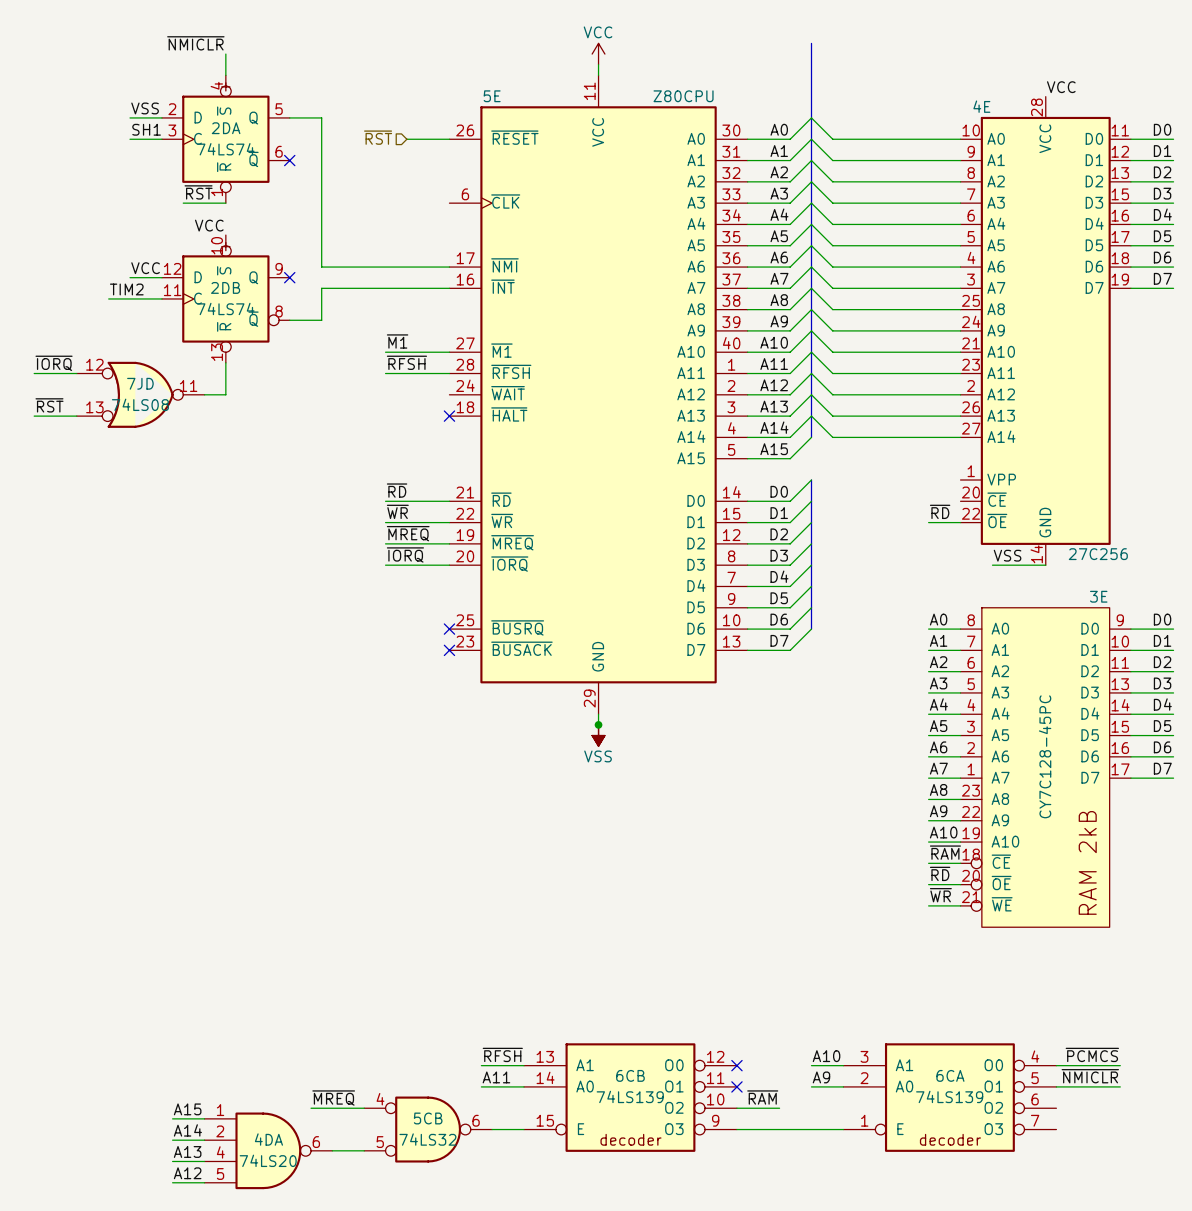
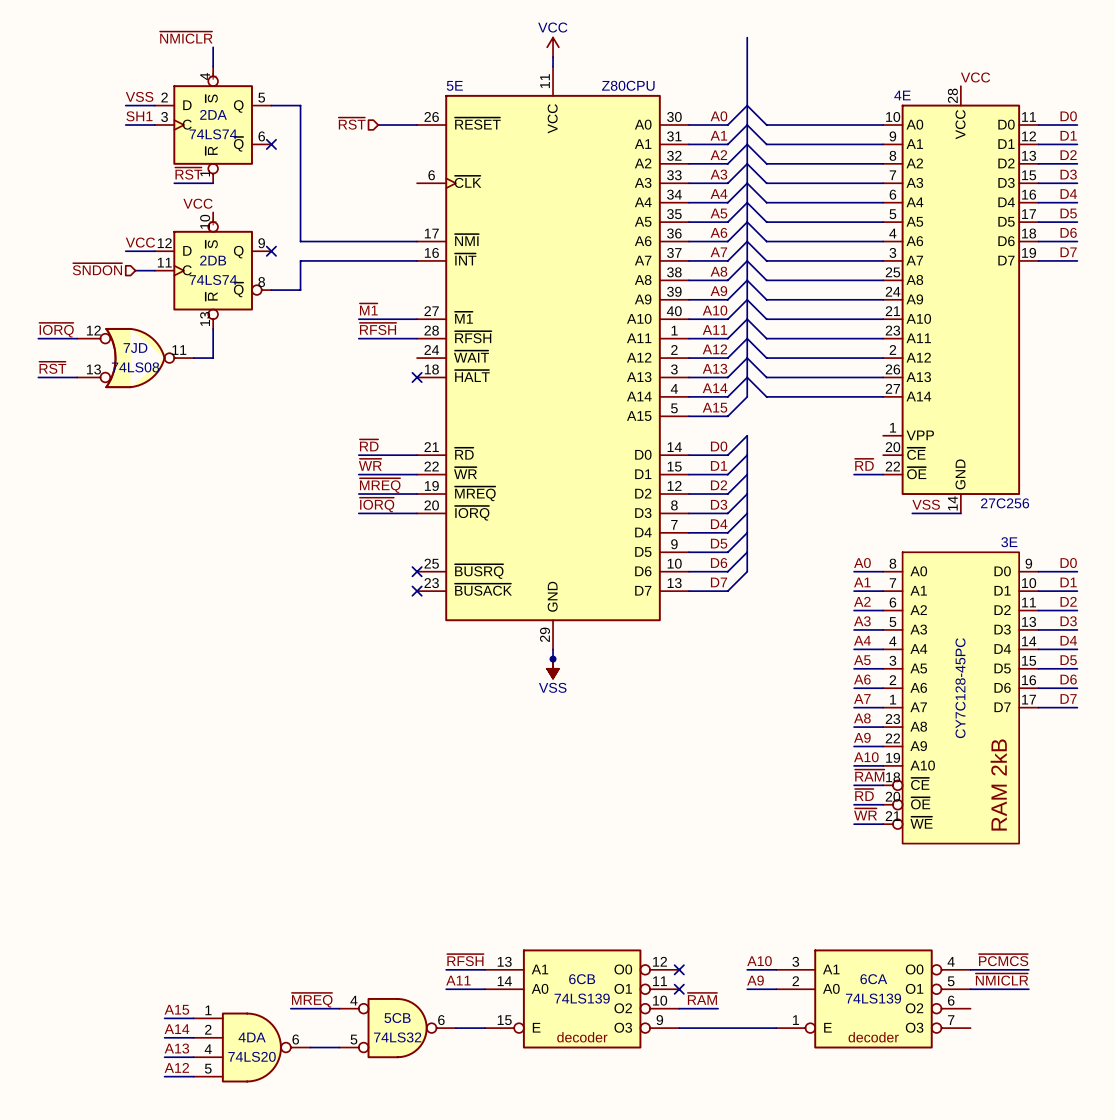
label: TIM2 (126, 289) -> none
hierarchical label: none -> ~{SNDON} (97, 269)
wire: (108, 298) (140, 298) -> none

